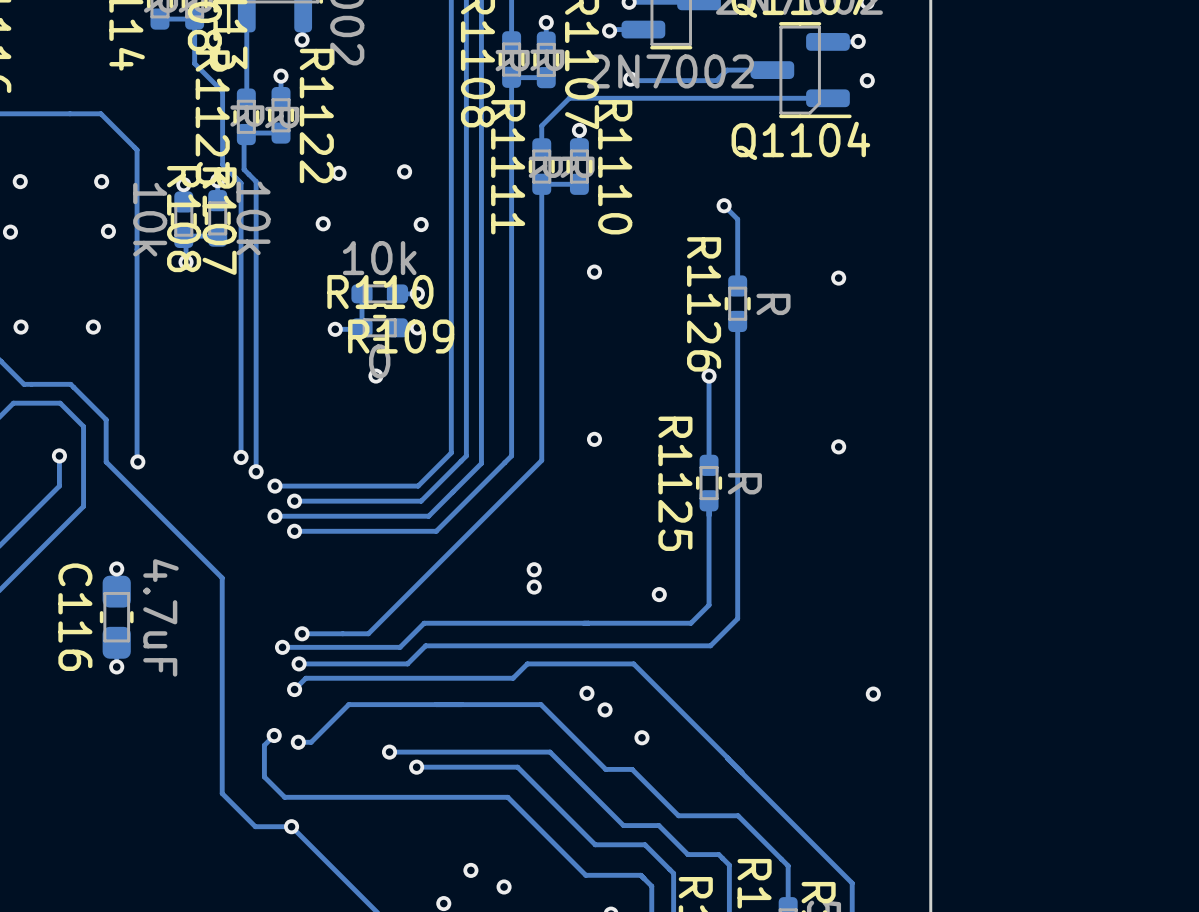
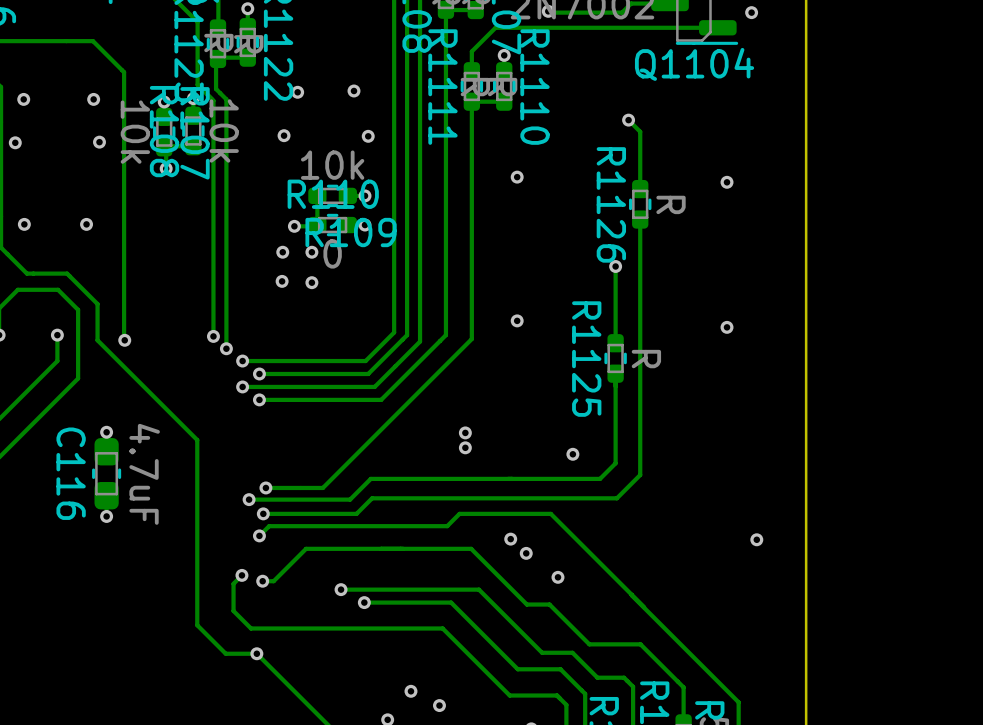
via: none -> (282, 252)
via: none -> (311, 252)
via: (375, 376) -> none
via: none -> (282, 281)
via: none -> (311, 282)

